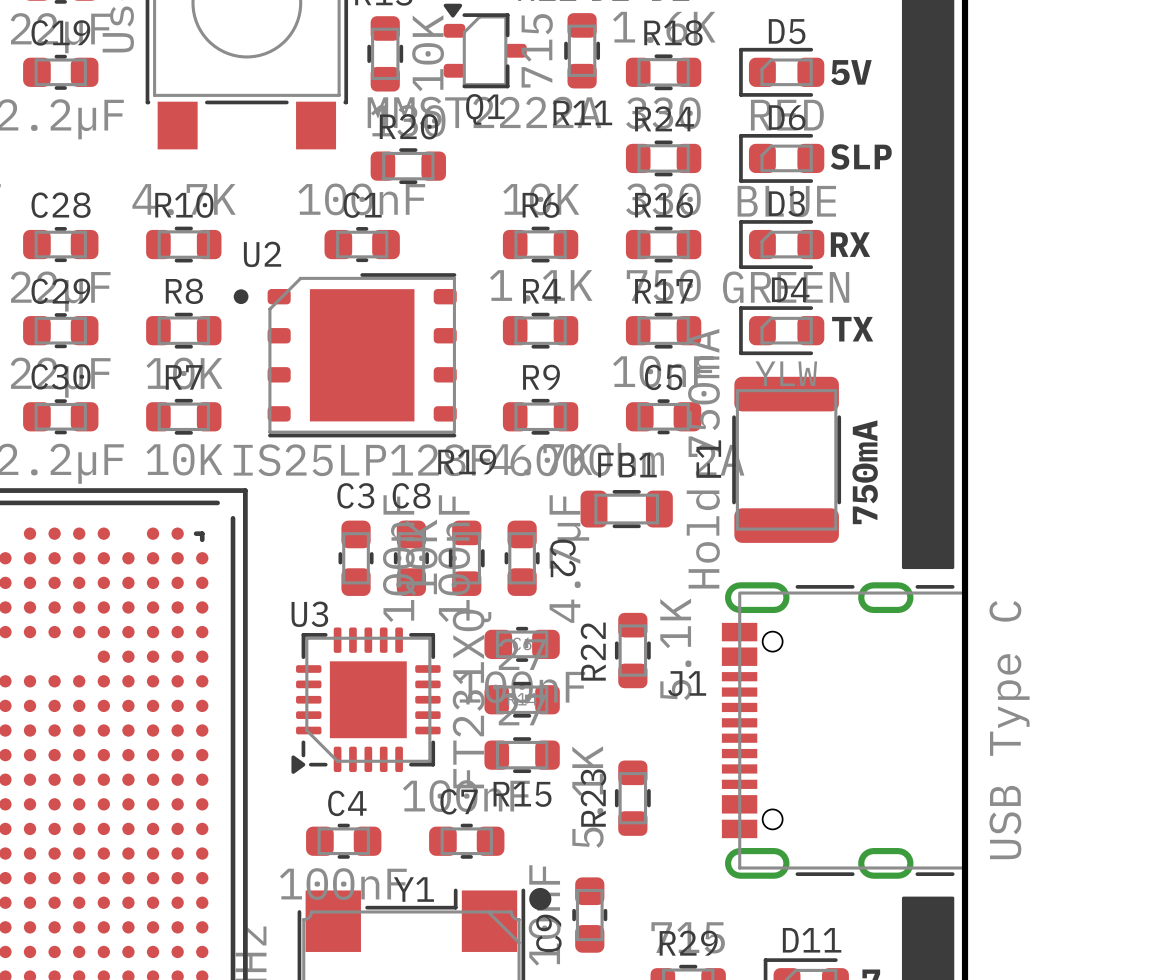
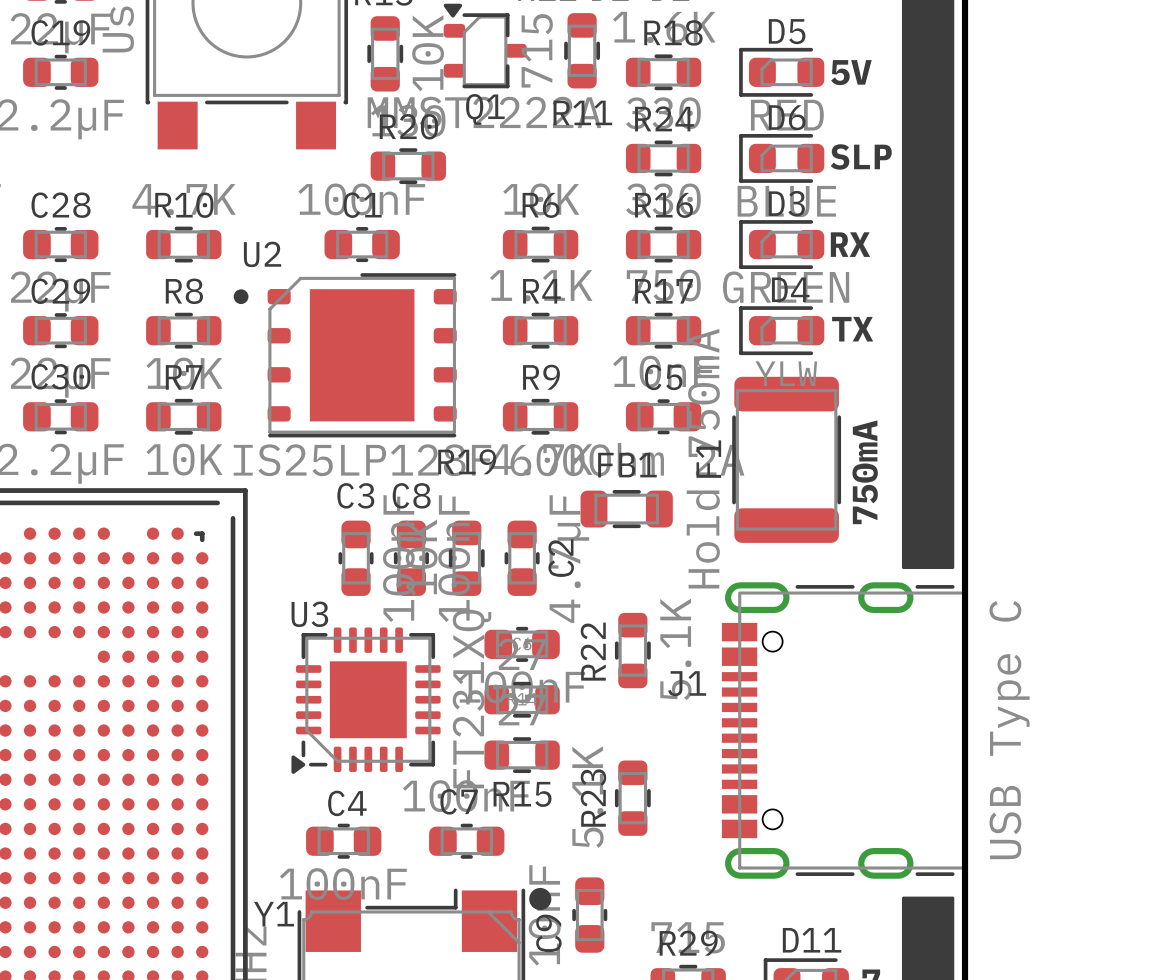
C2 name rotation: 0° (563, 558) -> 180° (561, 558)
Y1 name position: Y1 (413, 889) -> Y1 (273, 914)

